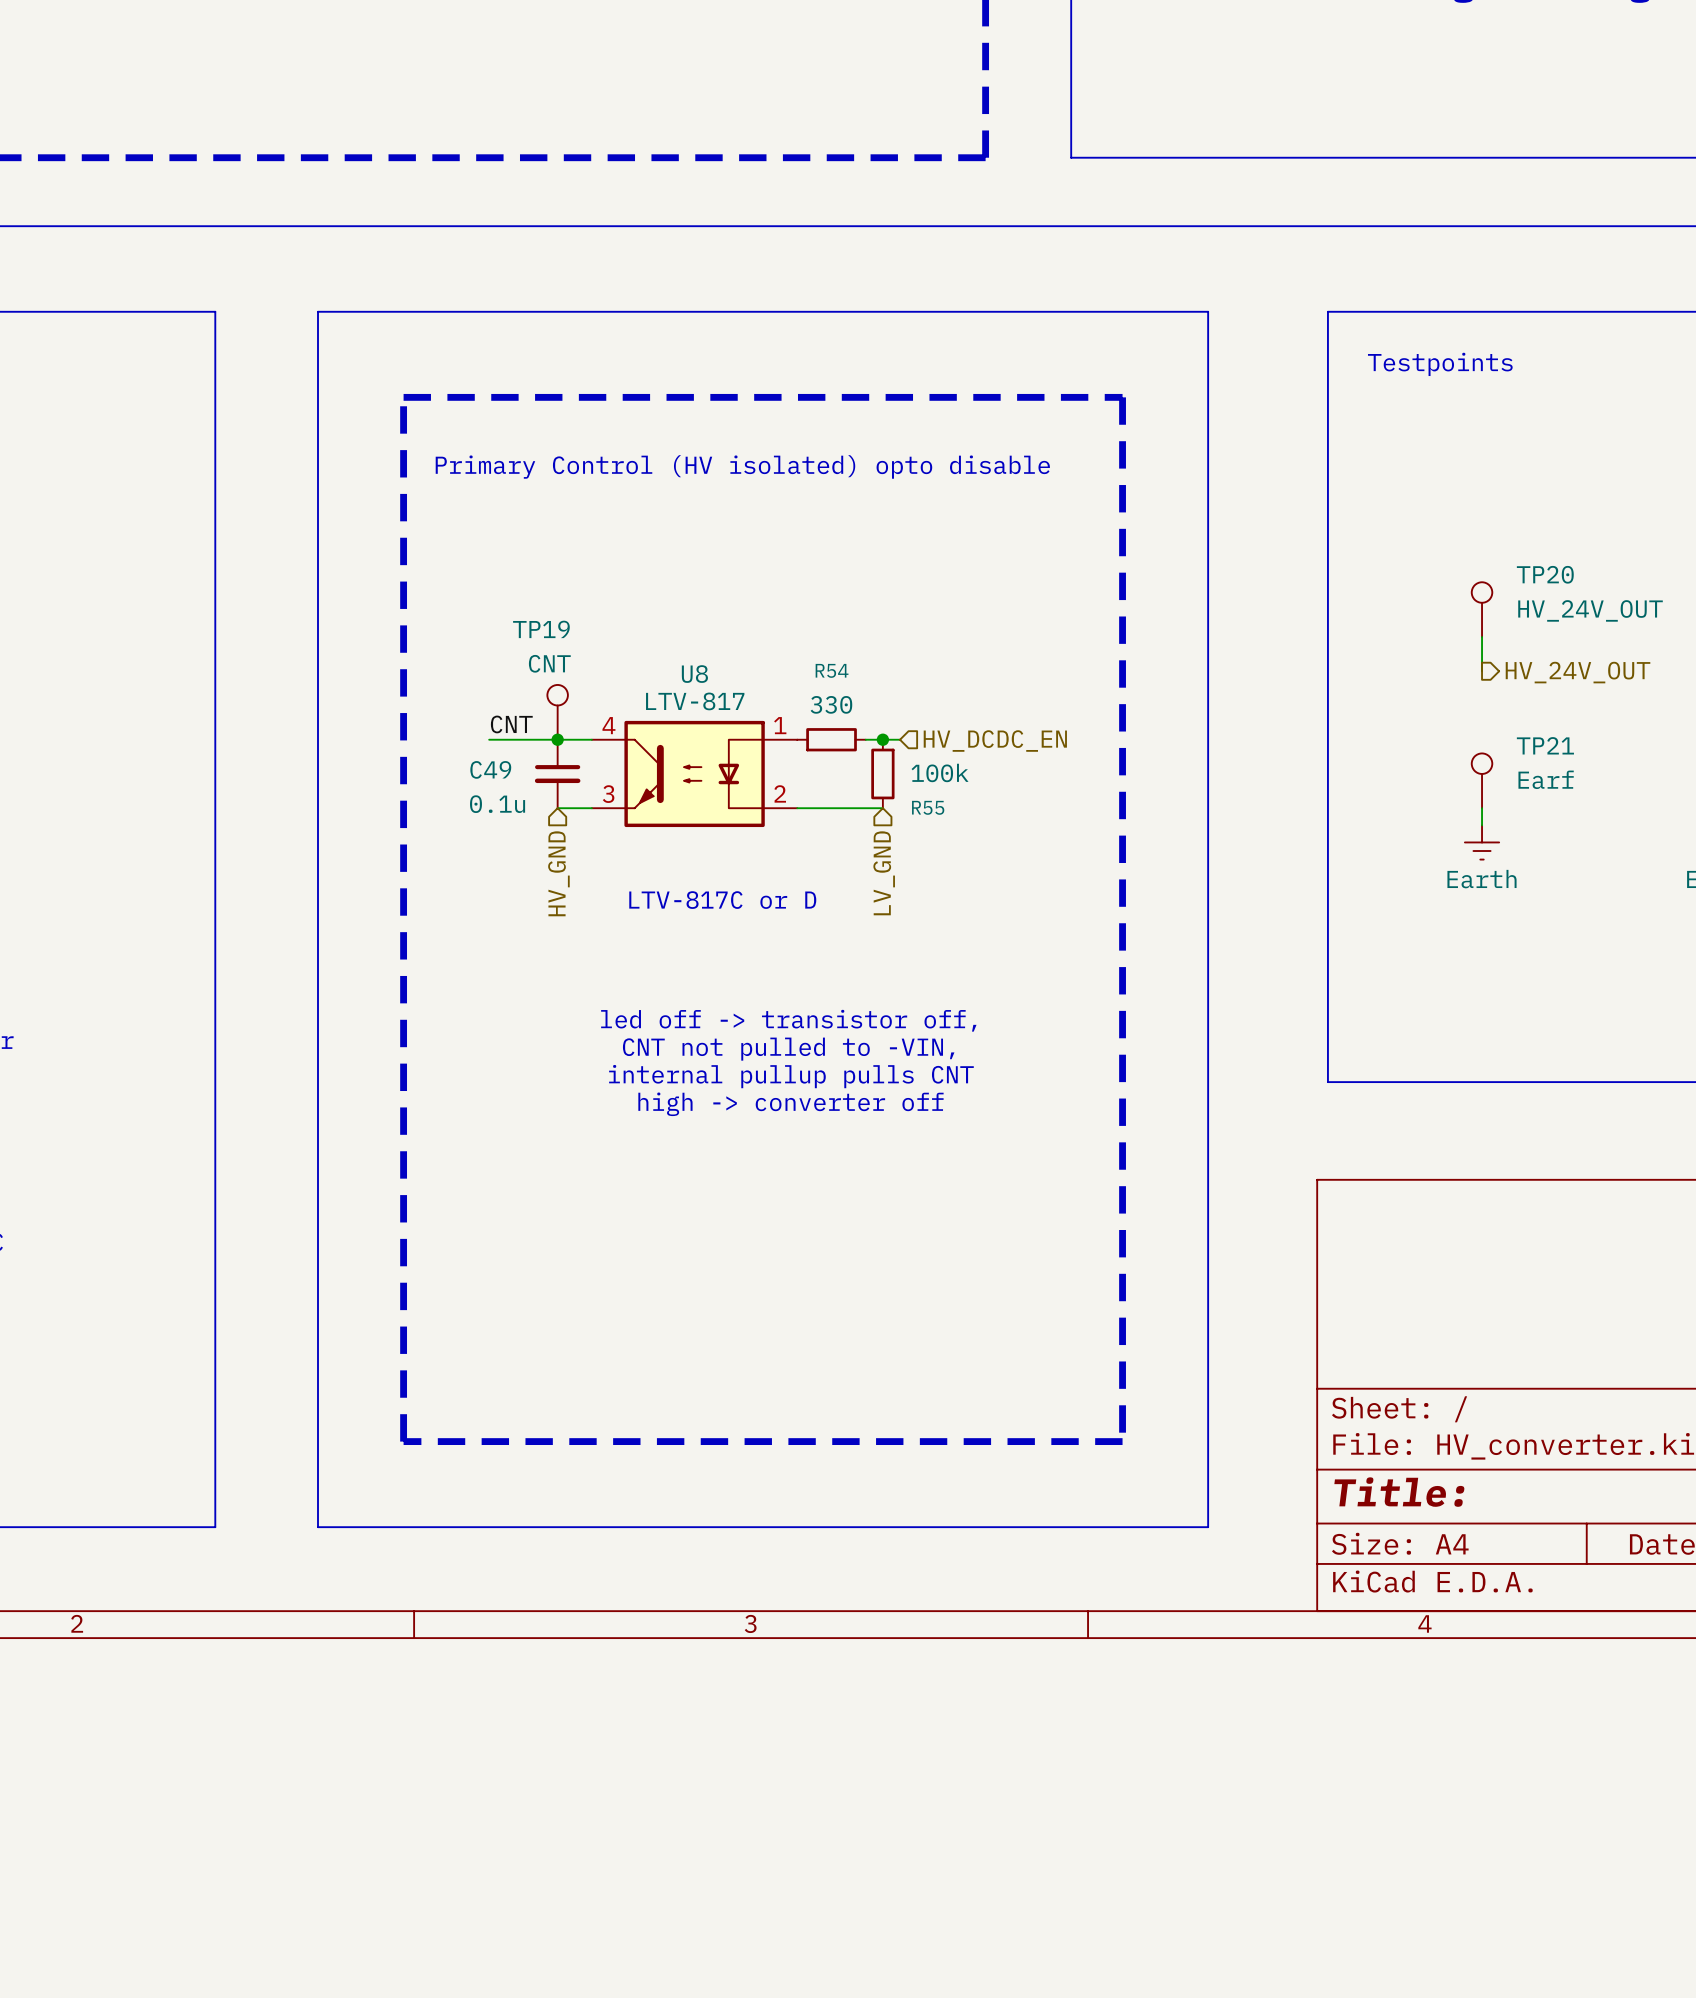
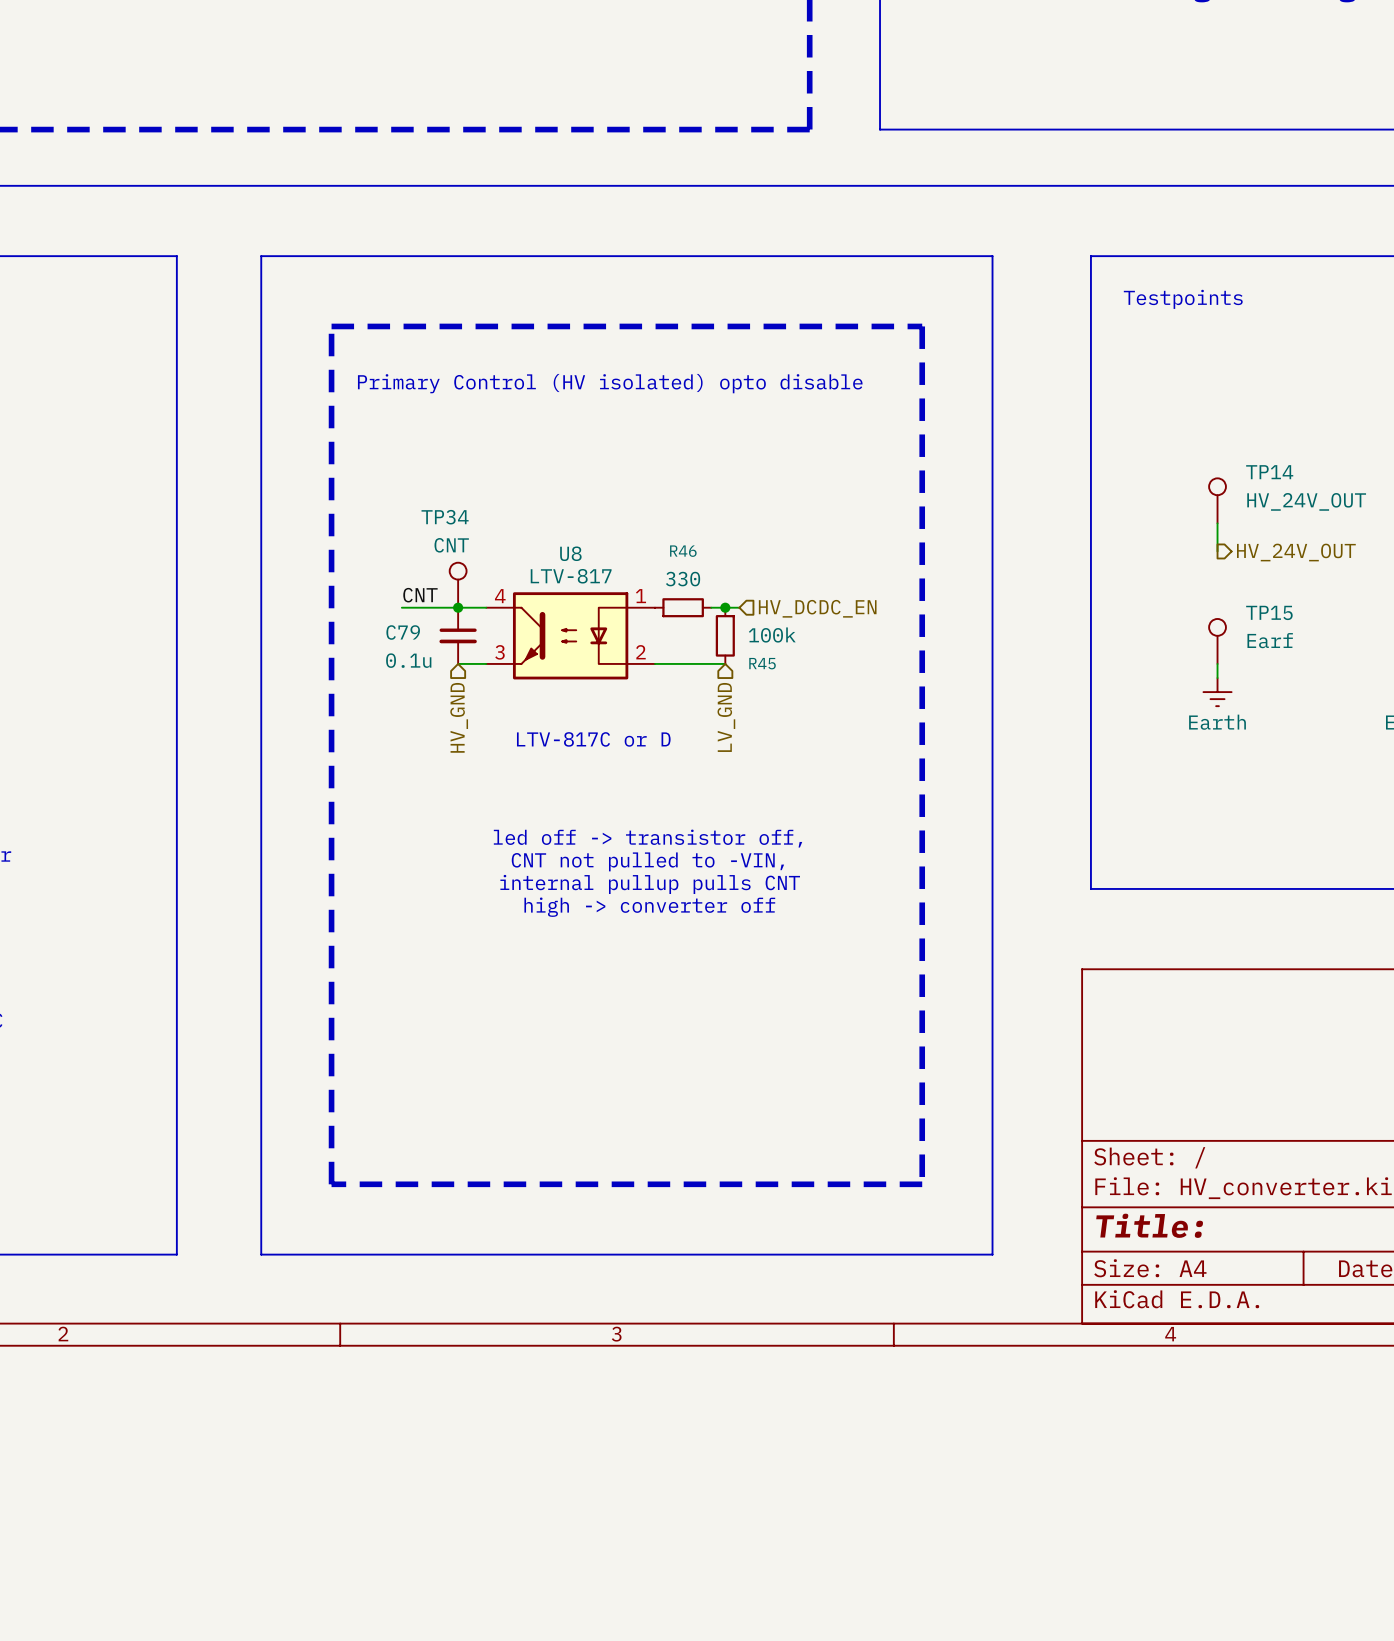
TP20 name: TP20 (1545, 574) -> TP14 (1269, 472)
TP19 name: TP19 (541, 629) -> TP34 (445, 517)
R54 name: R54 (832, 670) -> R46 (683, 551)
TP21 name: TP21 (1545, 745) -> TP15 (1269, 612)
C49 name: C49 (490, 769) -> C79 (403, 632)
R55 name: R55 (928, 807) -> R45 (762, 663)

